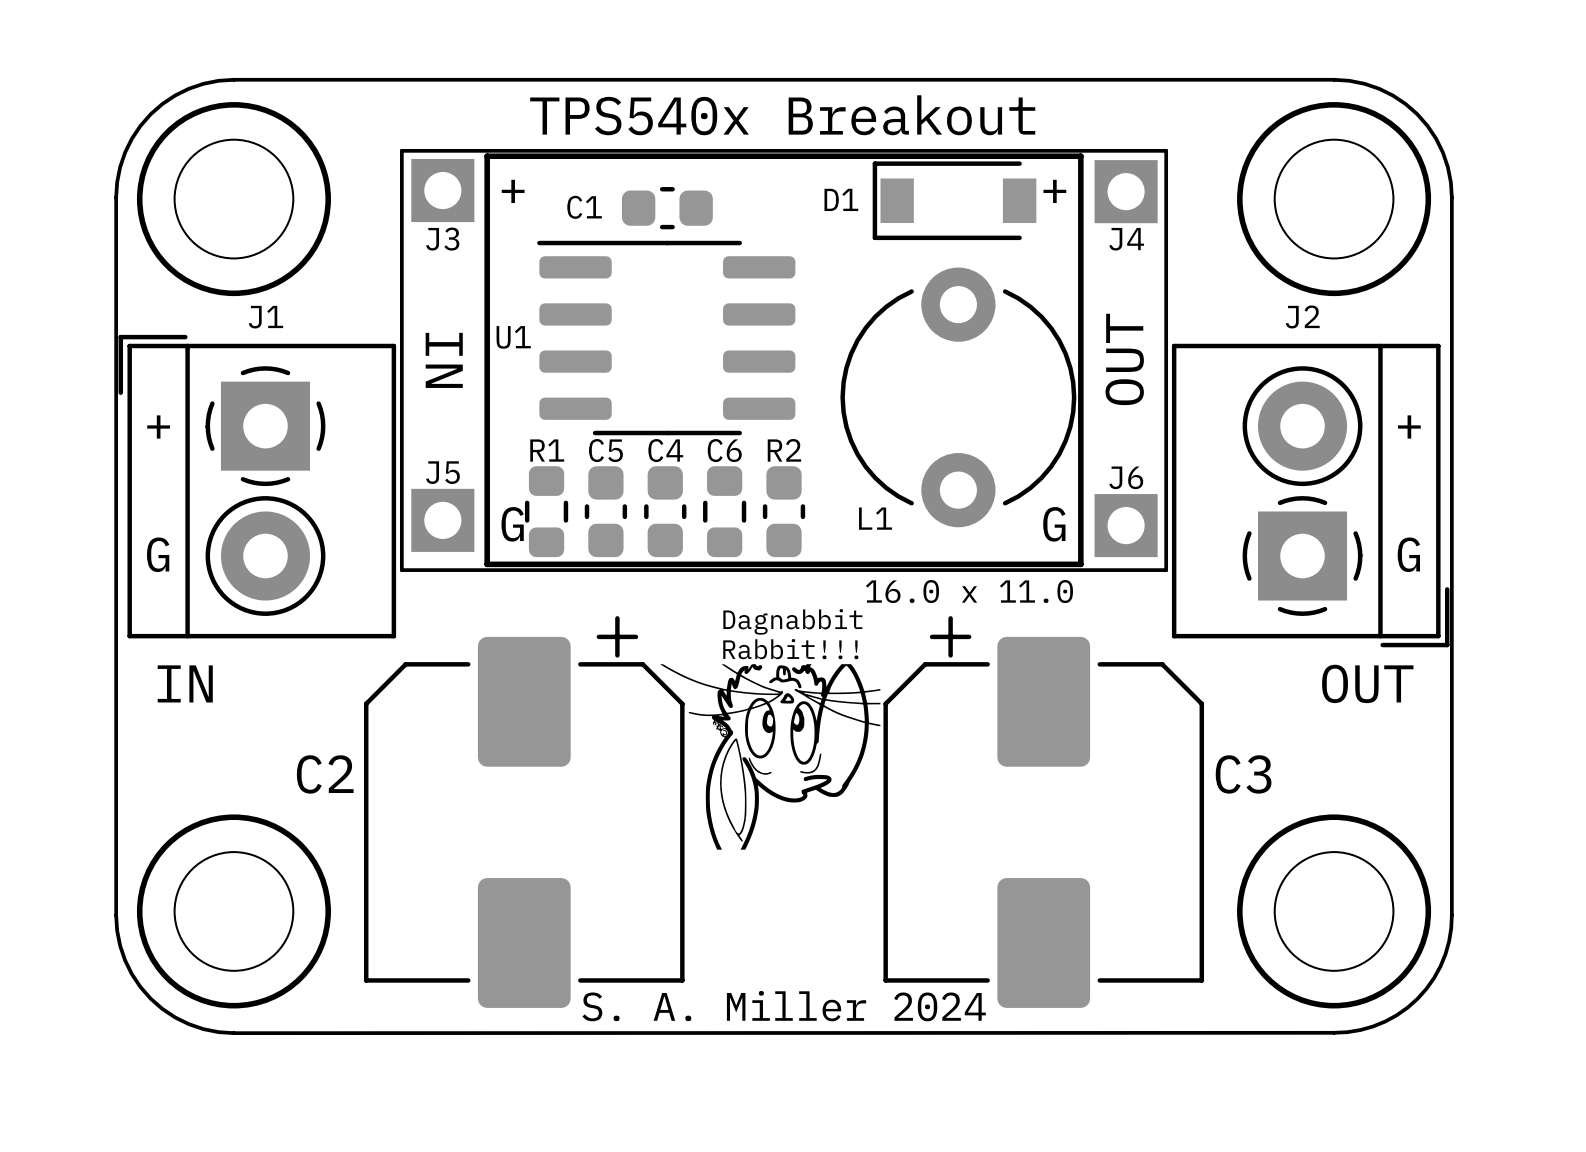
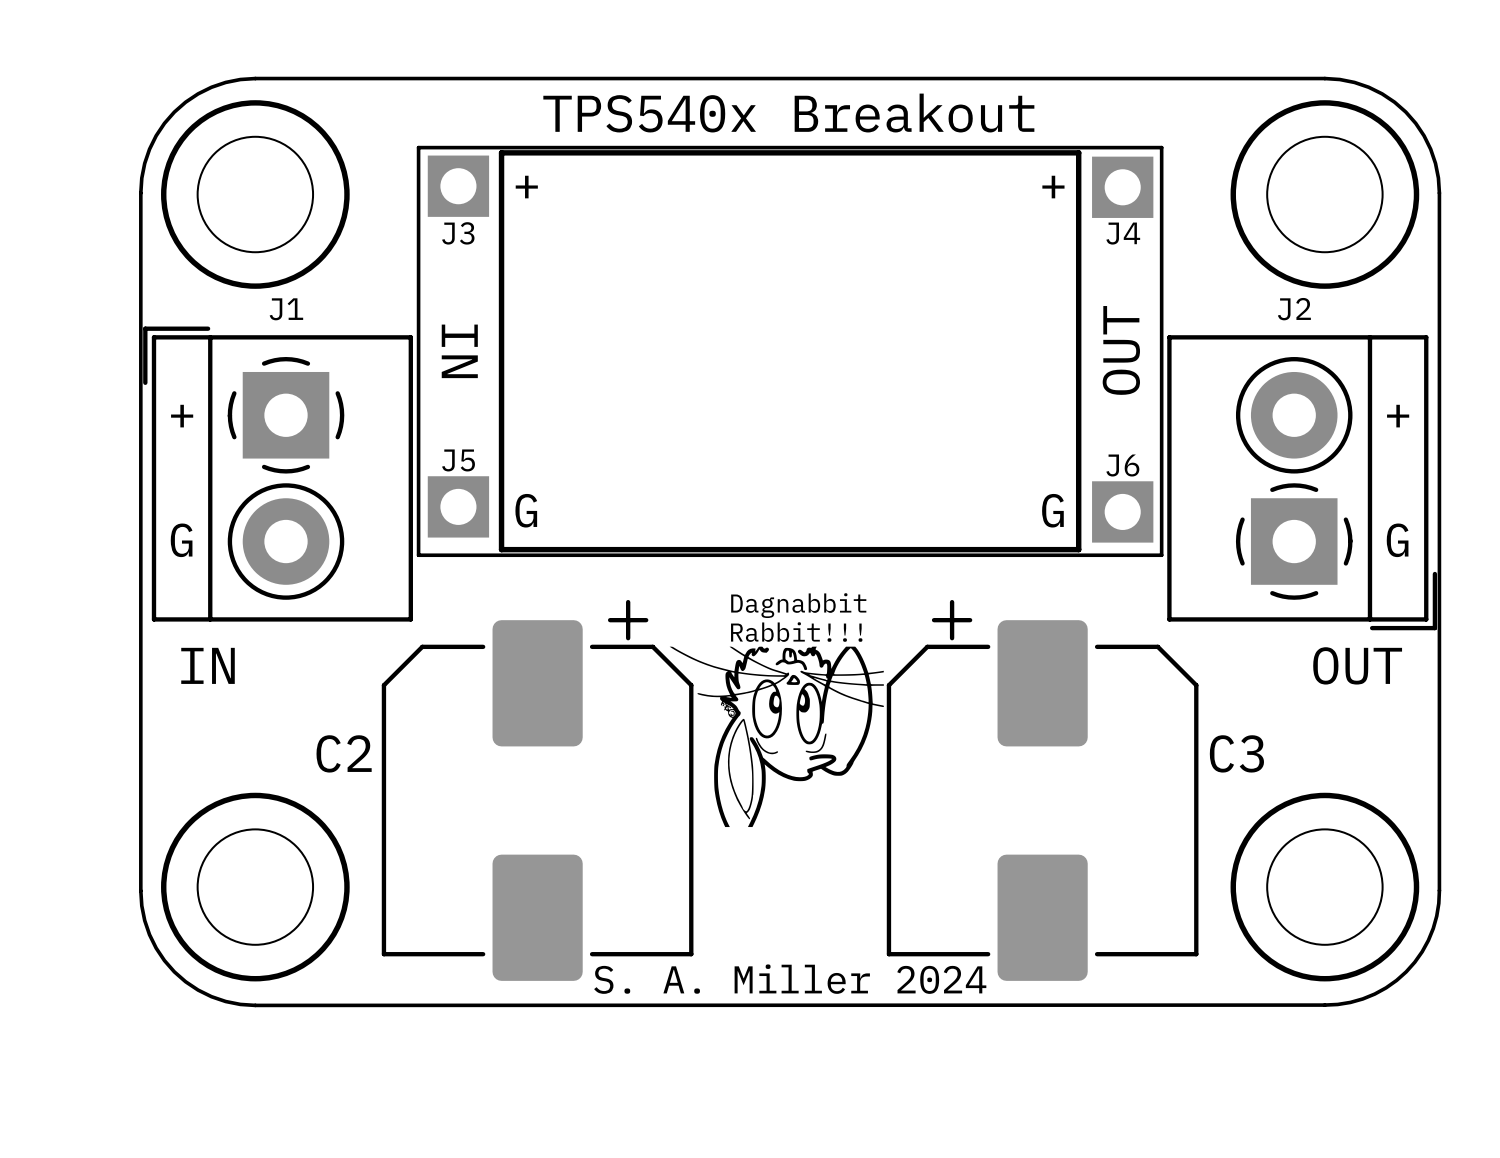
D1: (954, 200) -> none
C1: (667, 208) -> none
U1: (666, 338) -> none
L1: (958, 397) -> none
R1: (546, 511) -> none
C5: (605, 511) -> none
C4: (665, 511) -> none
R2: (724, 511) -> none
C6: (784, 511) -> none
text: 16.0 x 11.0 (969, 591) -> none

